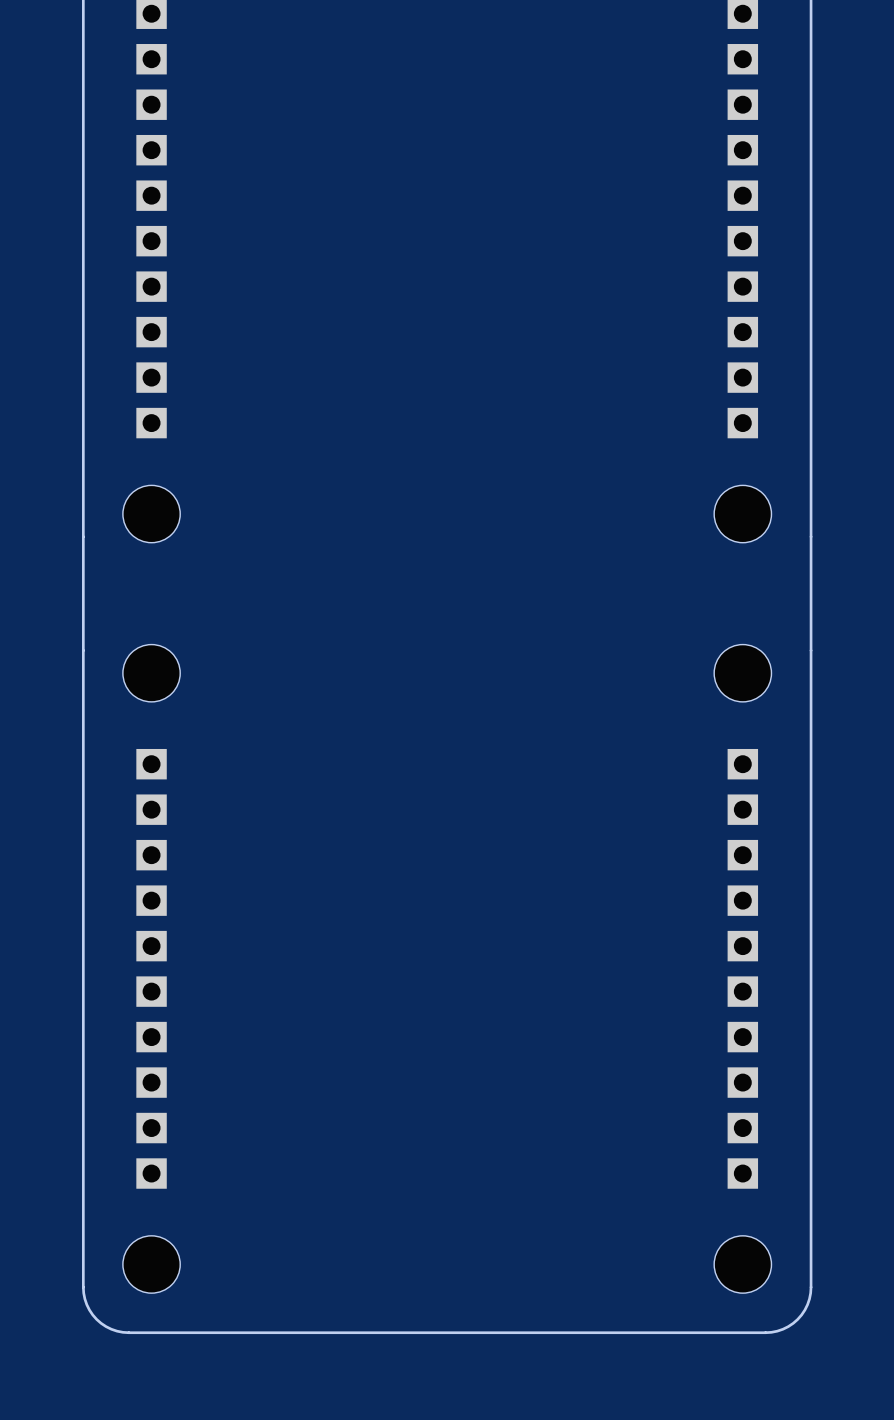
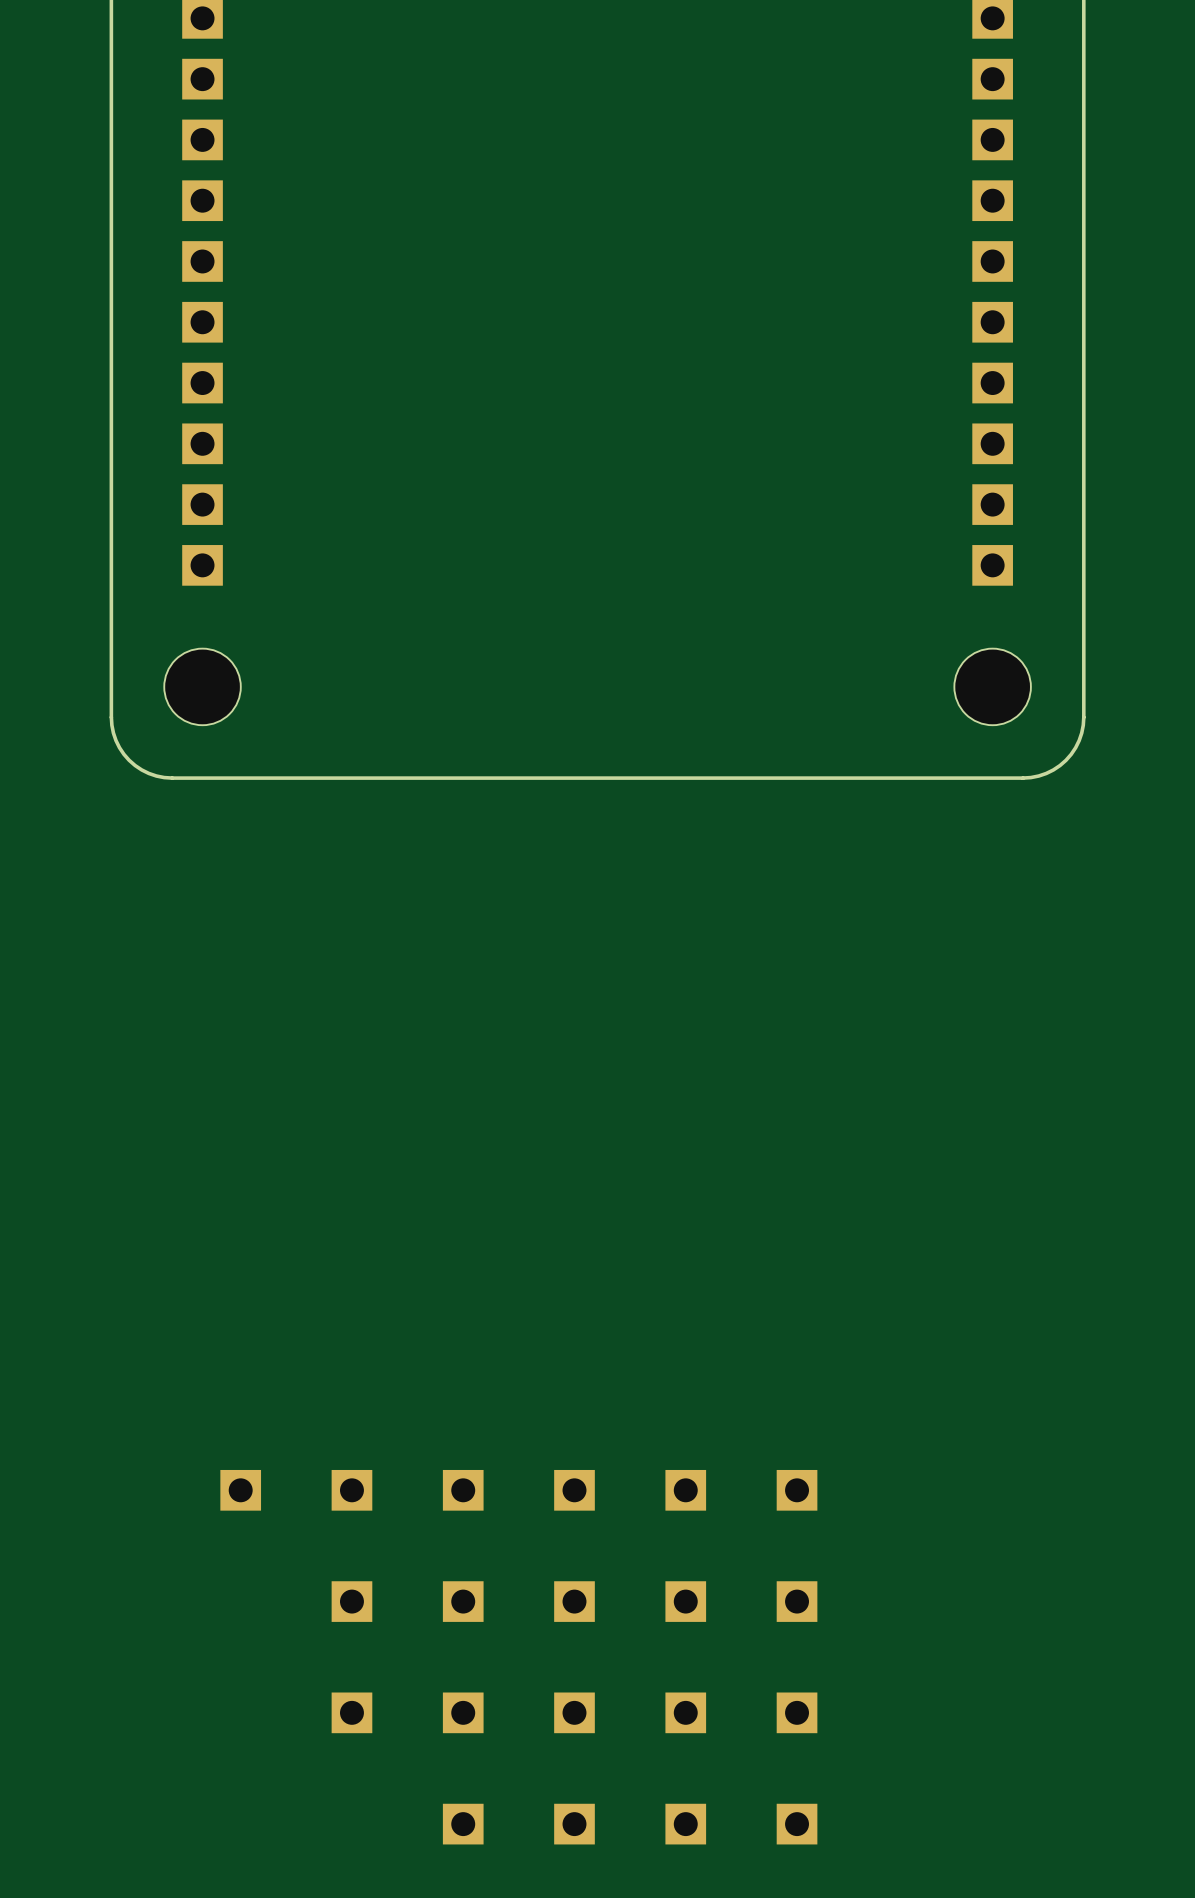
board edge: (811, 536) (811, 1287) (807, 1304) (797, 1319) (782, 1329) (765, 1332) (128, 1332) (117, 1331) (106, 1326) (92, 1314) (84, 1299) (83, 1287) (83, 536) -> (1083, 717) (1079, 740) (1066, 760) (1046, 773) (1023, 778) (164, 777) (141, 769) (123, 754) (113, 733) (111, 717)
part: (151, 673) -> none
part: (742, 673) -> none
part: (151, 764) -> none
part: (742, 764) -> none
part: (151, 809) -> none
part: (742, 809) -> none
part: (151, 855) -> none
part: (742, 855) -> none
part: (151, 900) -> none
part: (742, 900) -> none
part: (151, 946) -> none
part: (742, 946) -> none
part: (151, 991) -> none
part: (742, 991) -> none
part: (151, 1037) -> none
part: (742, 1037) -> none
part: (151, 1082) -> none
part: (742, 1082) -> none
part: none -> (240, 1490)
part: none -> (351, 1490)
part: none -> (463, 1490)
part: none -> (574, 1490)
part: none -> (685, 1490)
part: none -> (797, 1490)
part: (151, 1128) -> none
part: (742, 1128) -> none
part: (151, 1173) -> none
part: (742, 1173) -> none
part: none -> (351, 1601)
part: none -> (463, 1601)
part: none -> (574, 1601)
part: none -> (685, 1601)
part: none -> (797, 1601)
part: (151, 1264) -> none
part: (742, 1264) -> none
part: none -> (351, 1712)
part: none -> (463, 1712)
part: none -> (574, 1712)
part: none -> (685, 1712)
part: none -> (797, 1712)
part: none -> (463, 1824)
part: none -> (574, 1824)
part: none -> (685, 1824)
part: none -> (797, 1824)

